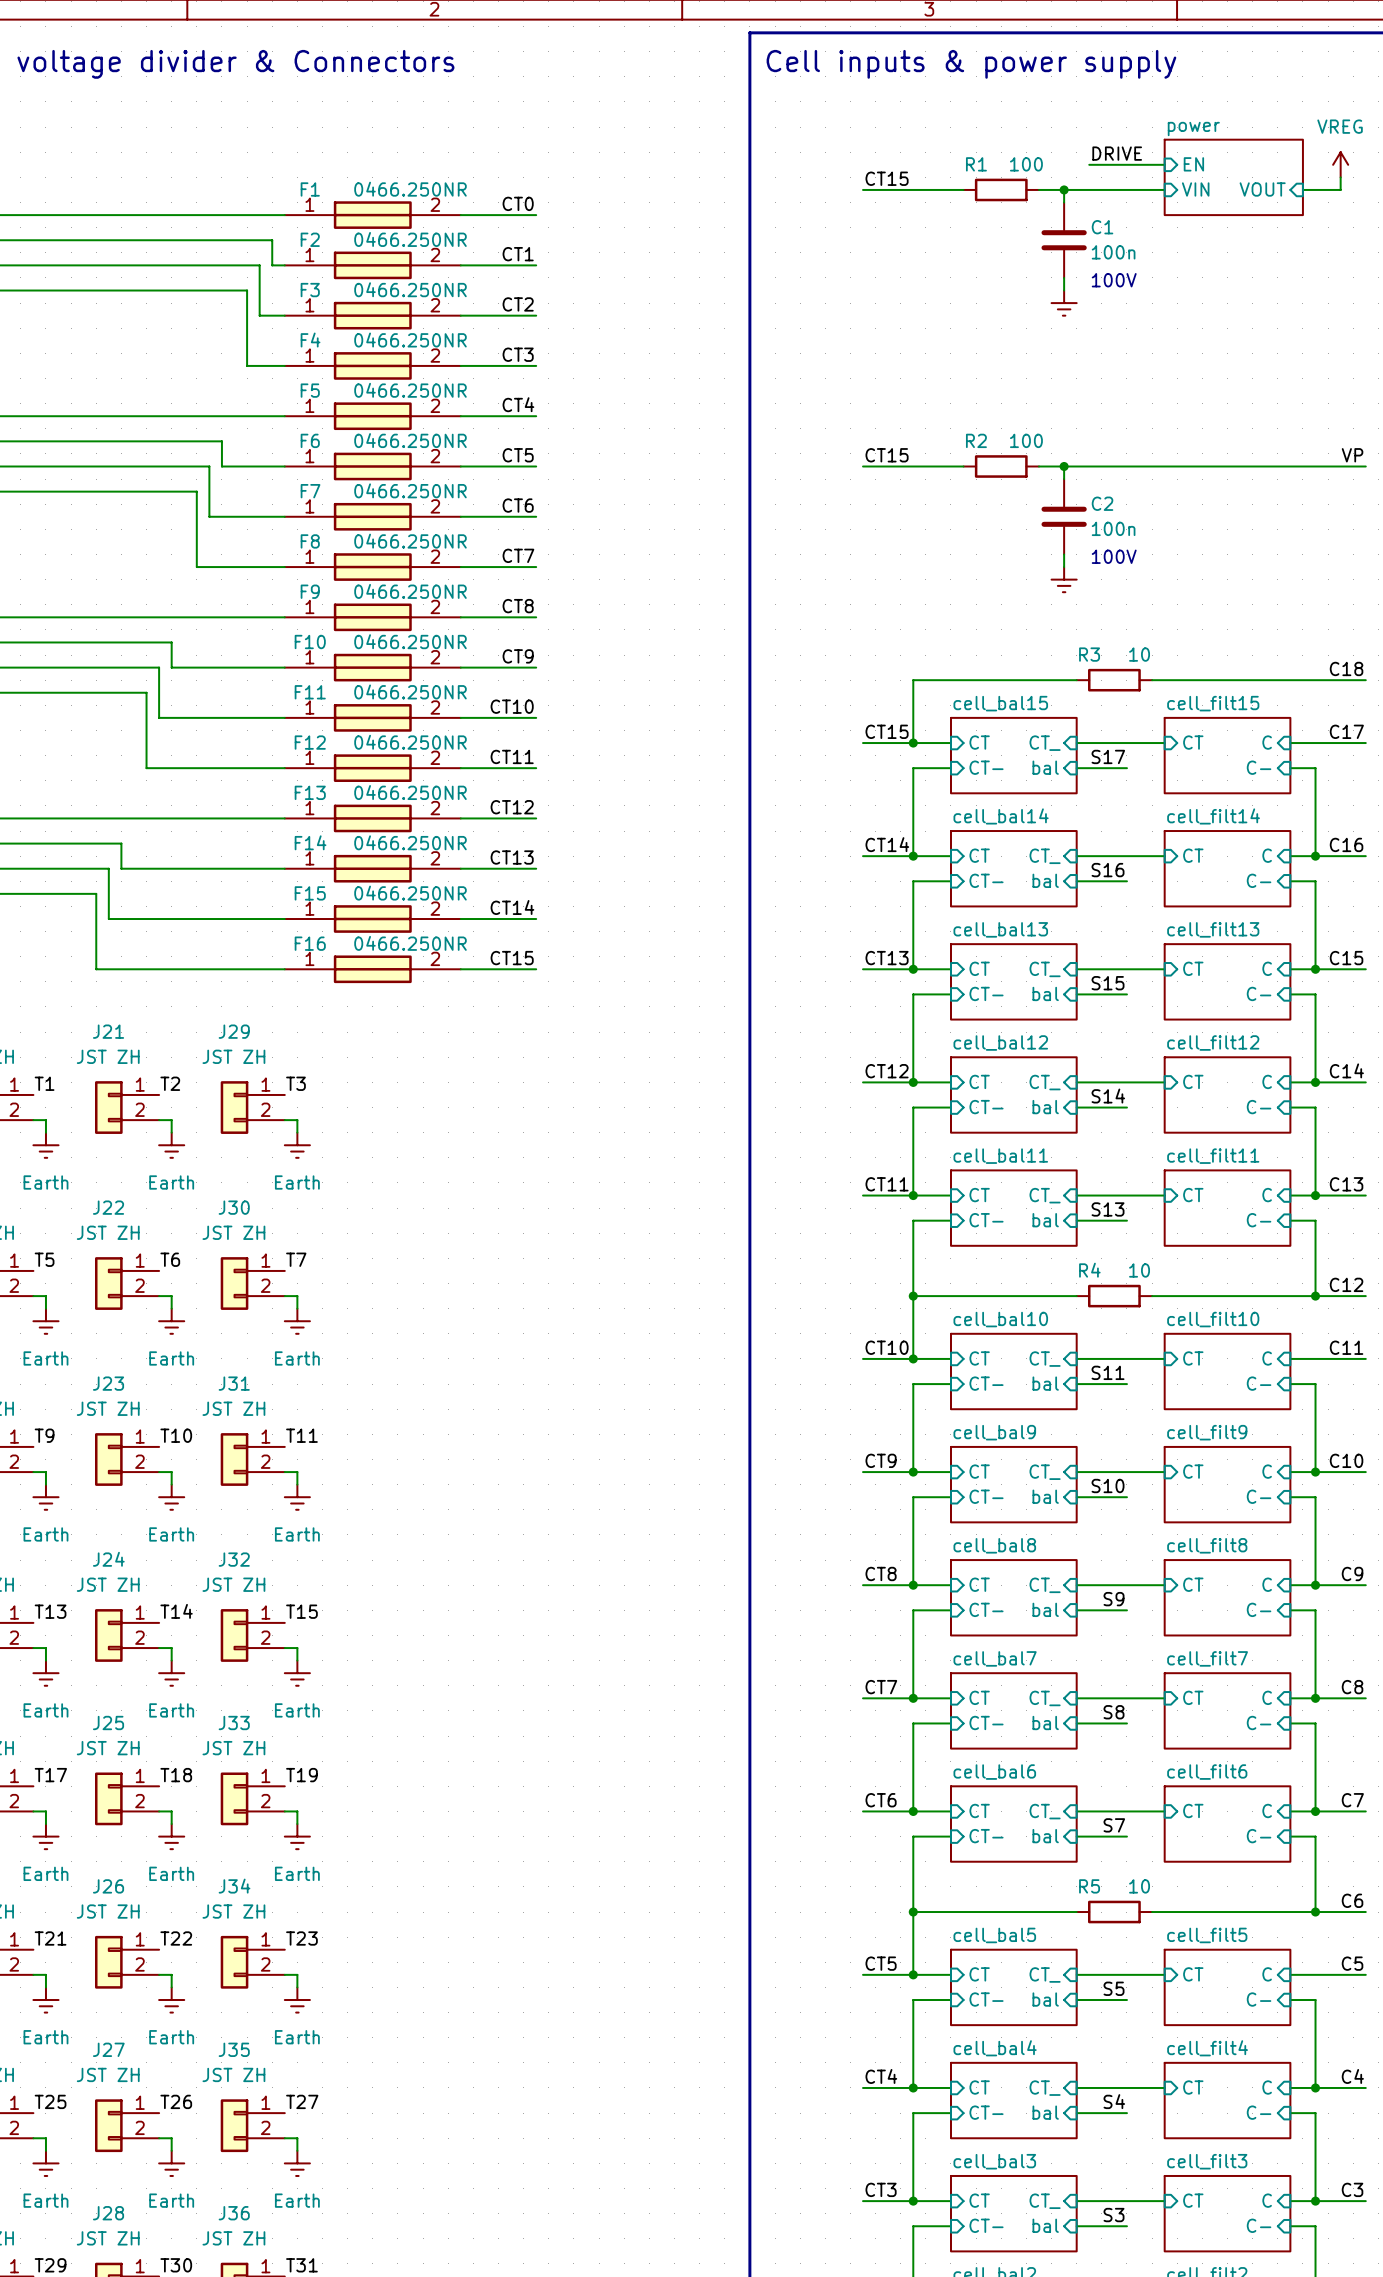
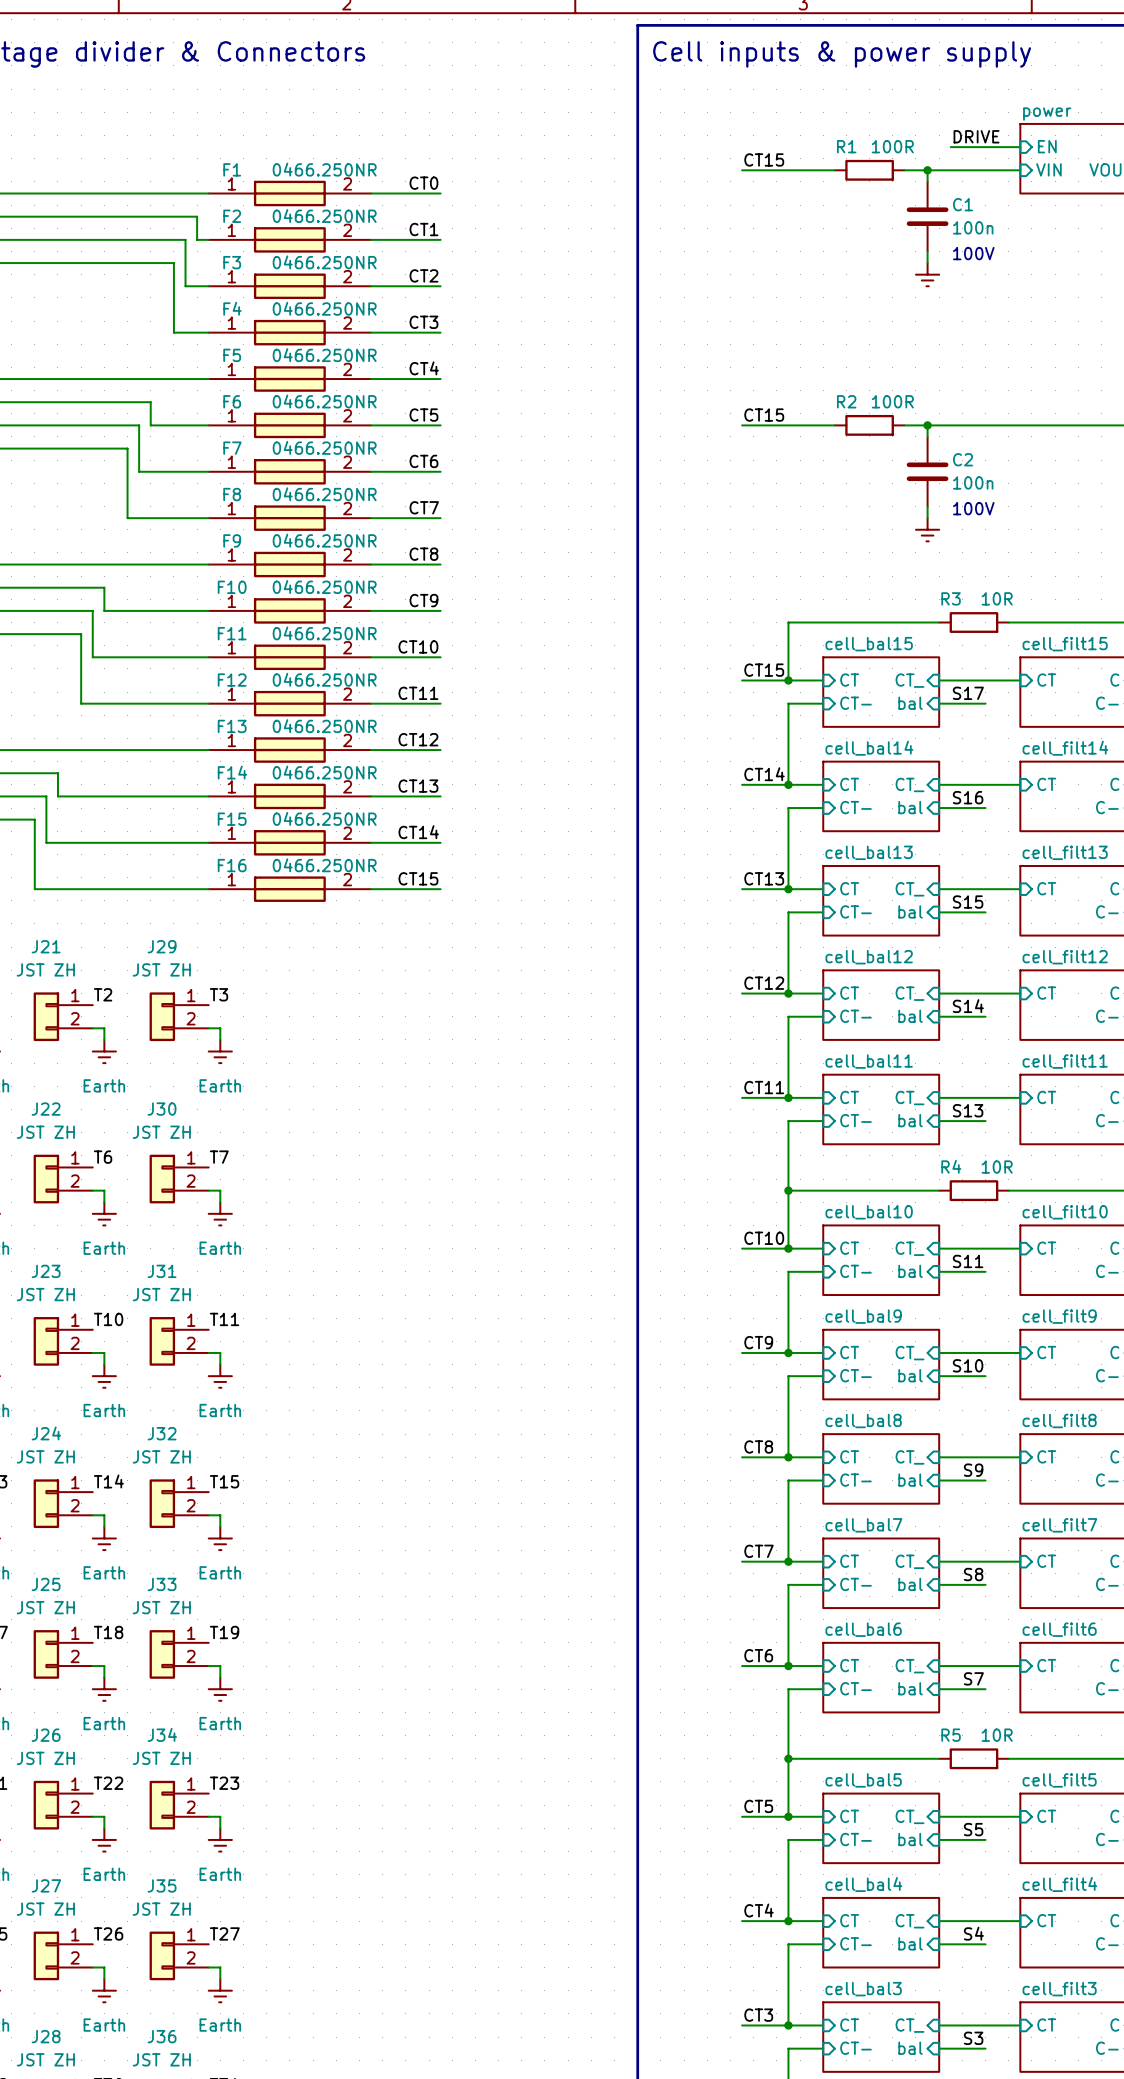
R1 value: 100 (1026, 164) -> 100R (892, 146)
R2 value: 100 (1026, 440) -> 100R (892, 401)
R3 value: 10 (1139, 654) -> 10R (997, 598)
R4 value: 10 (1139, 1270) -> 10R (997, 1167)
R5 value: 10 (1139, 1886) -> 10R (997, 1735)

